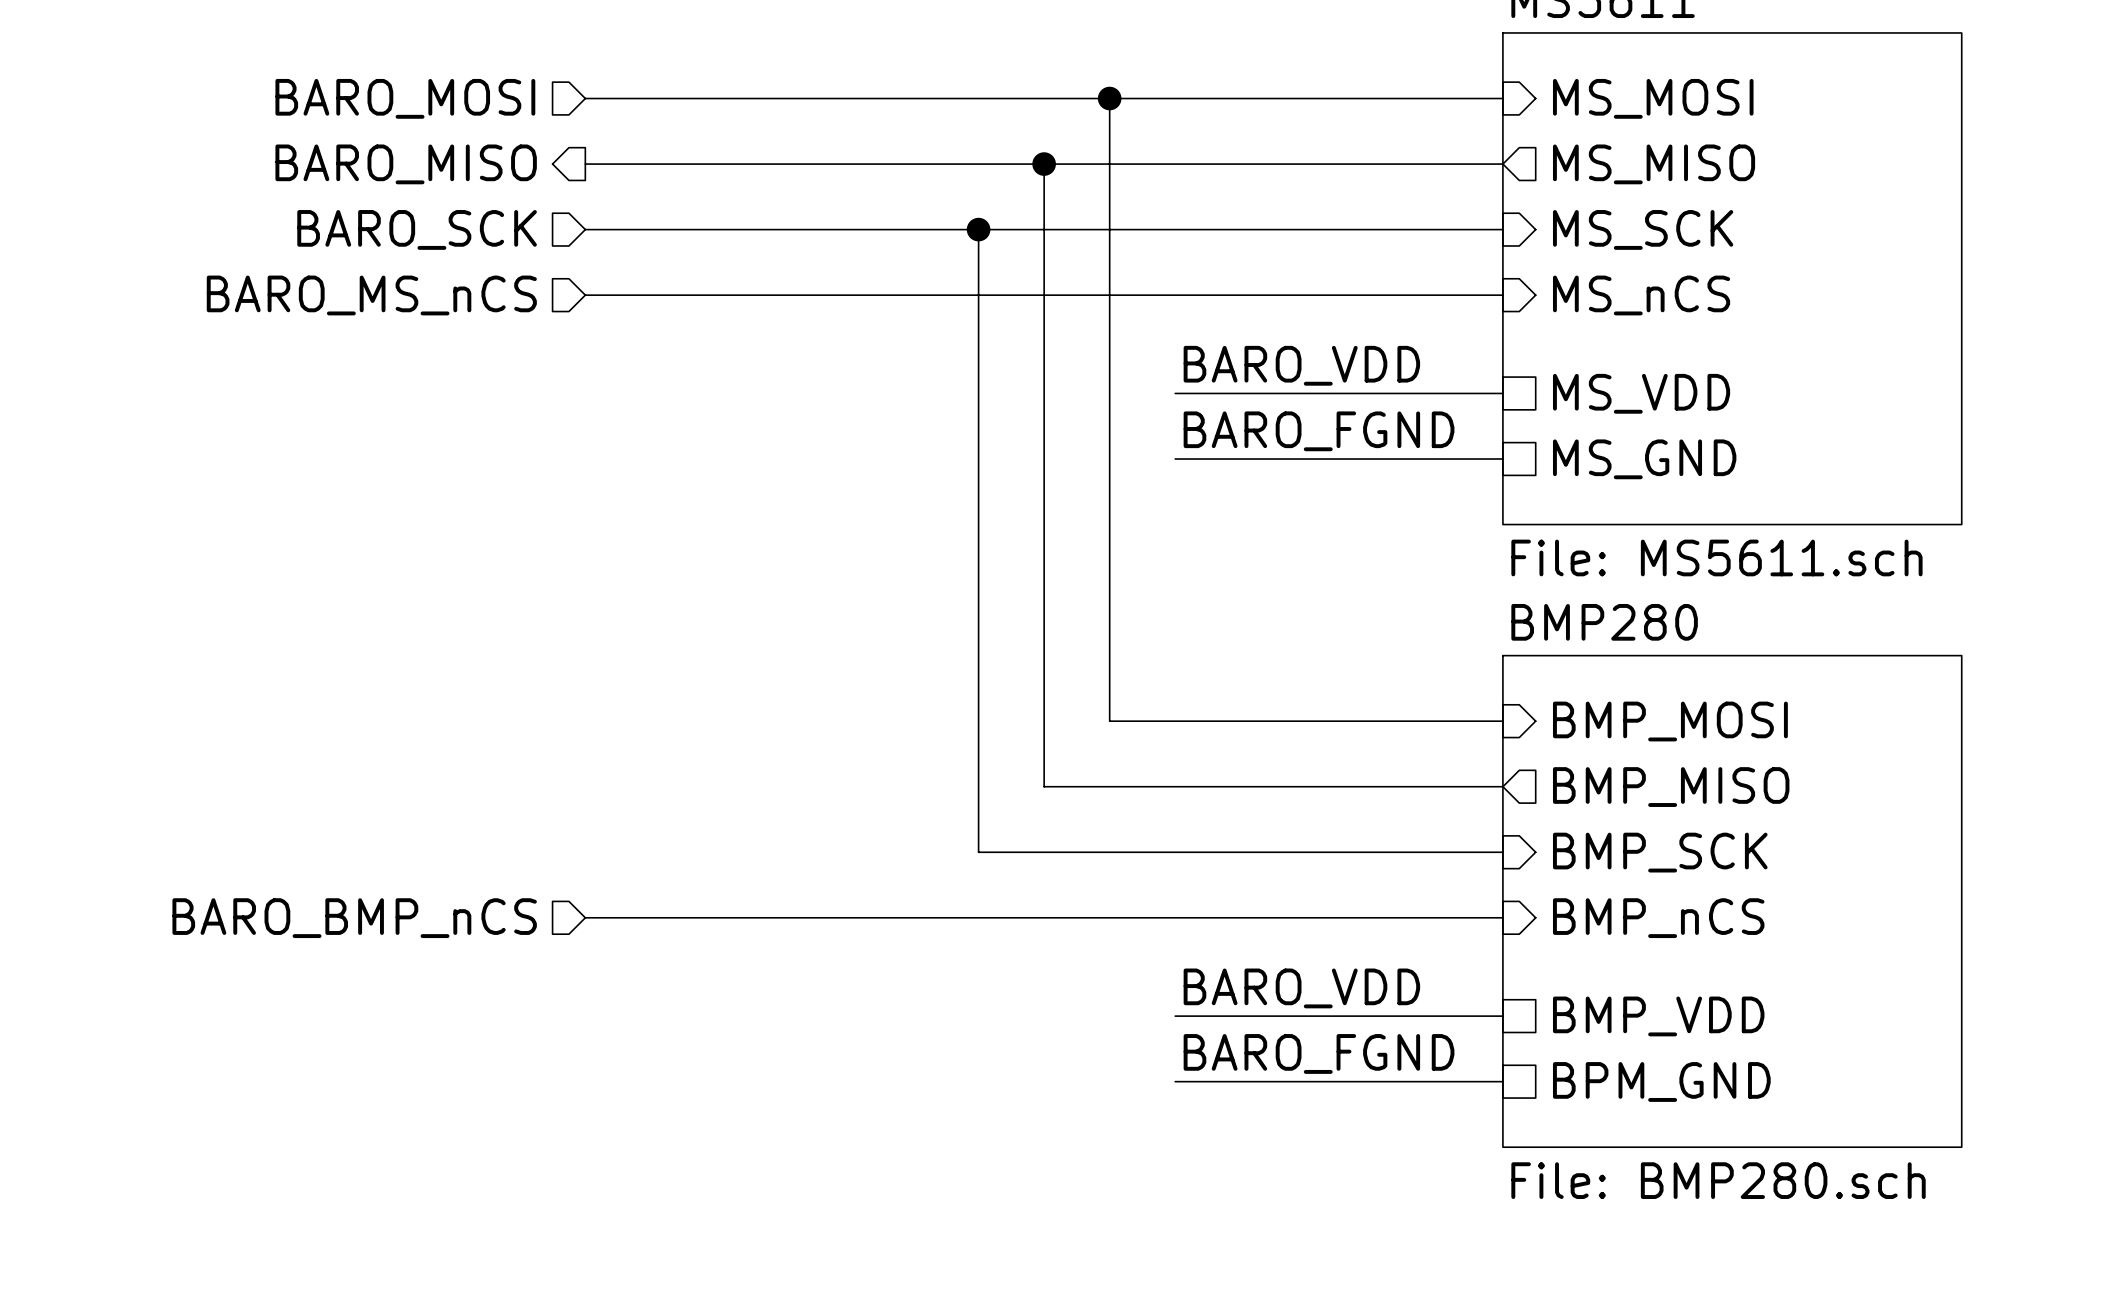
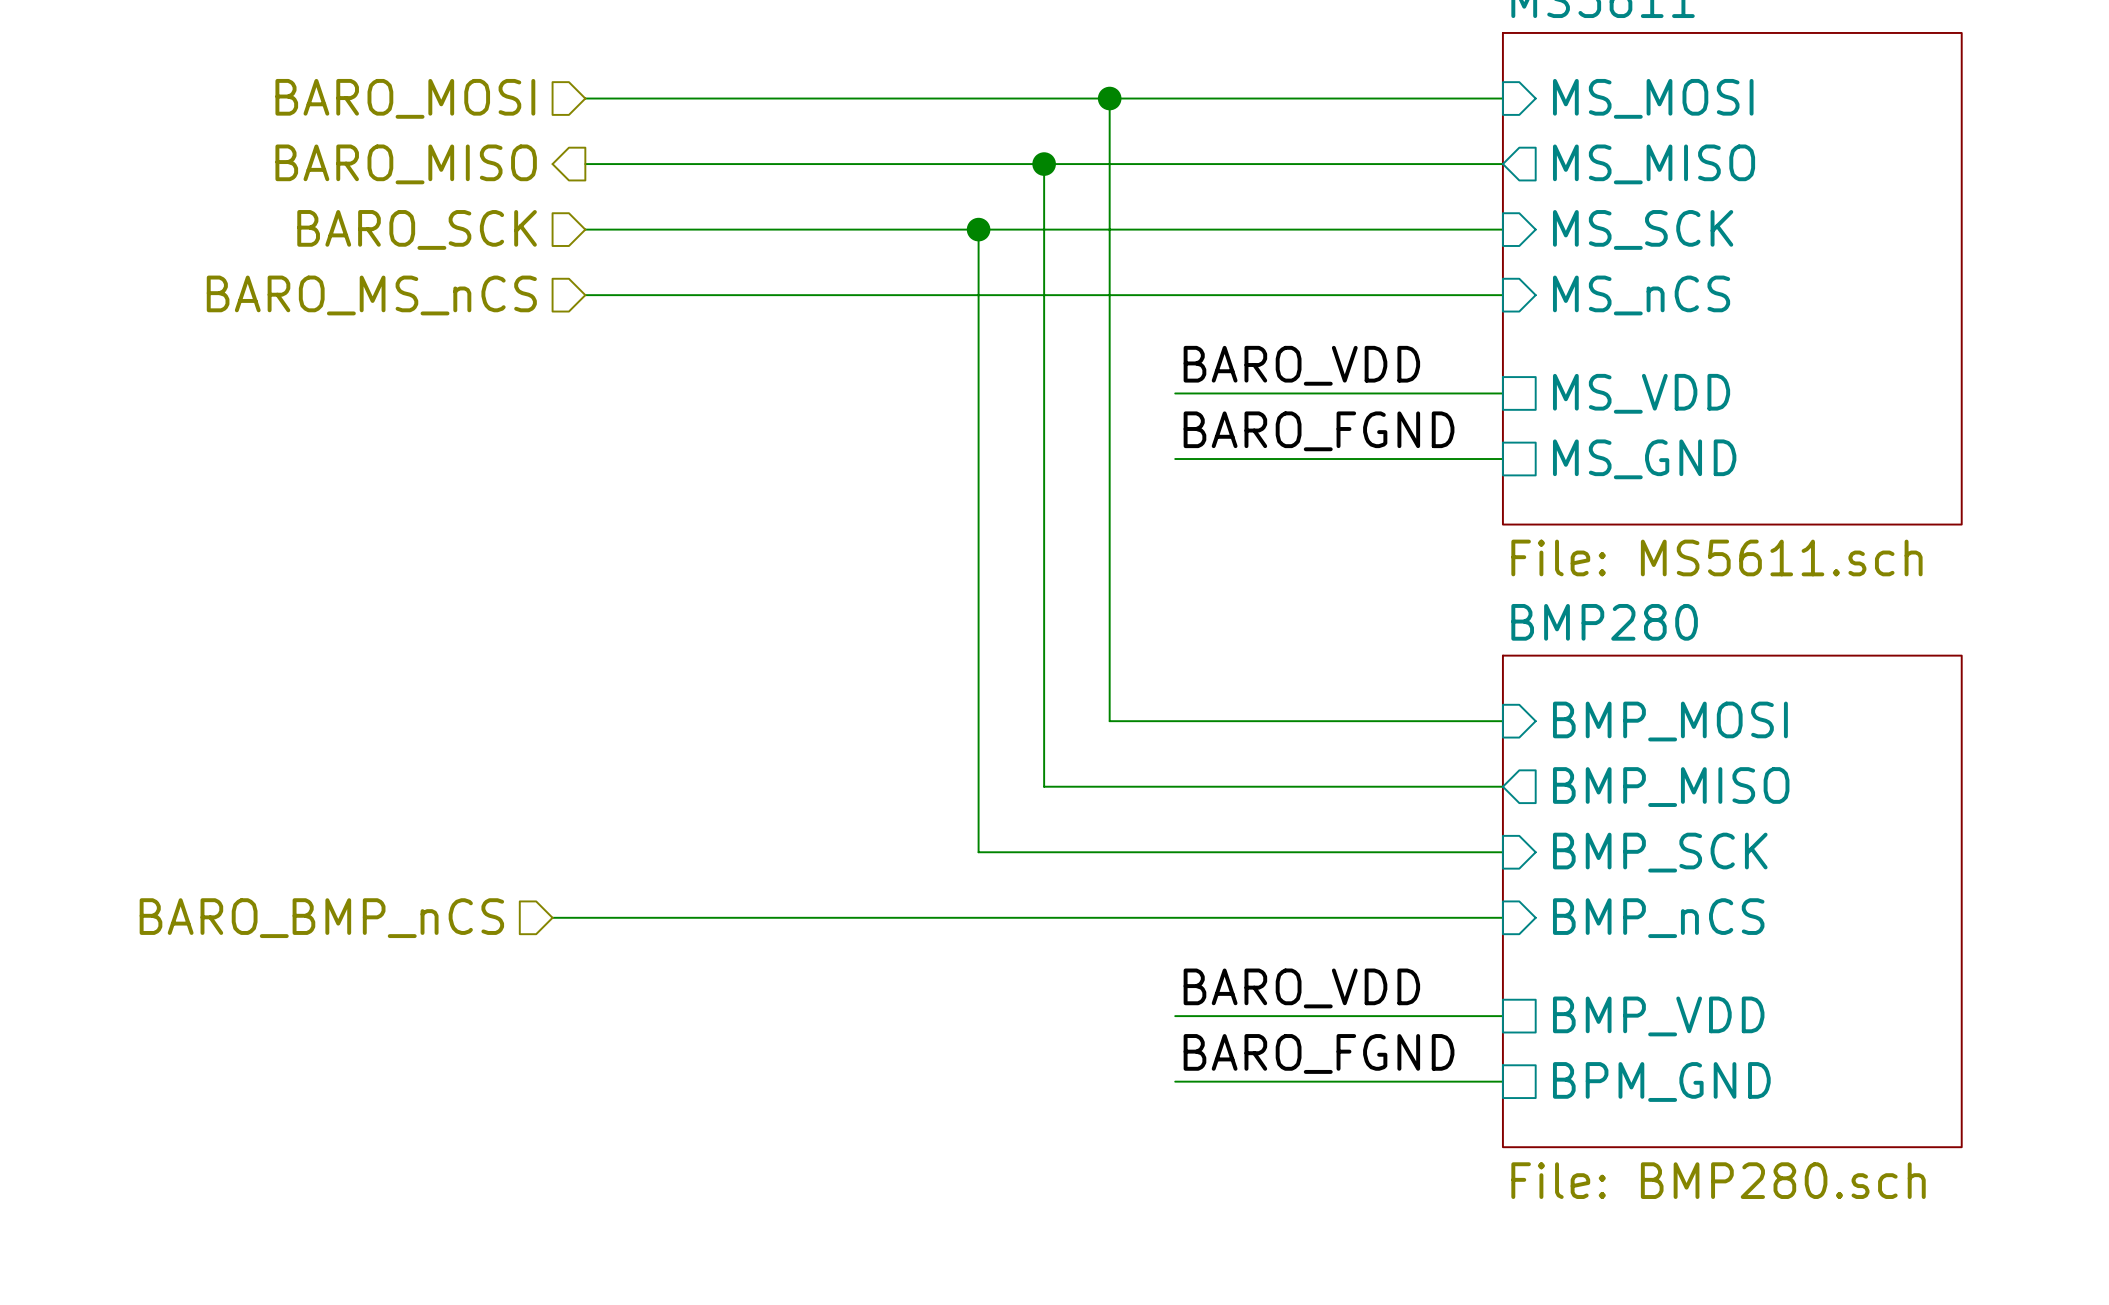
wire: none -> (552, 917) (585, 917)
hierarchical label position: BARO_BMP_nCS (354, 918) -> BARO_BMP_nCS (321, 918)

